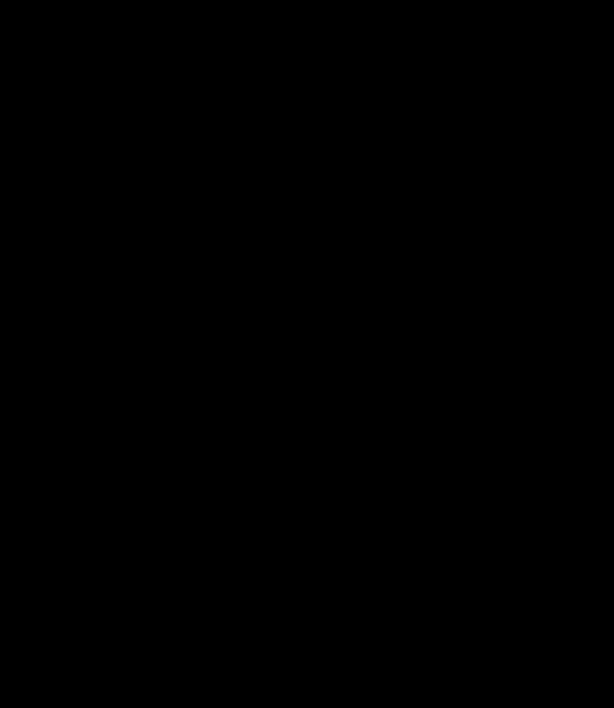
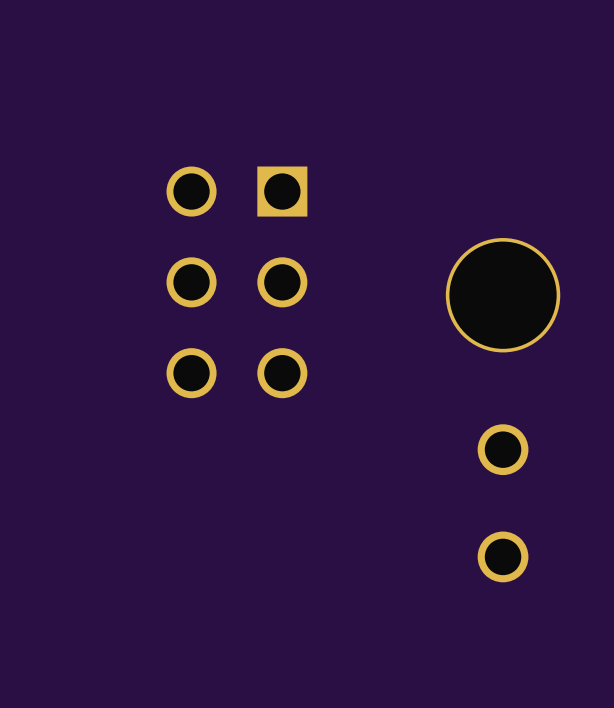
part: none -> (236, 282)
part: none -> (503, 410)

